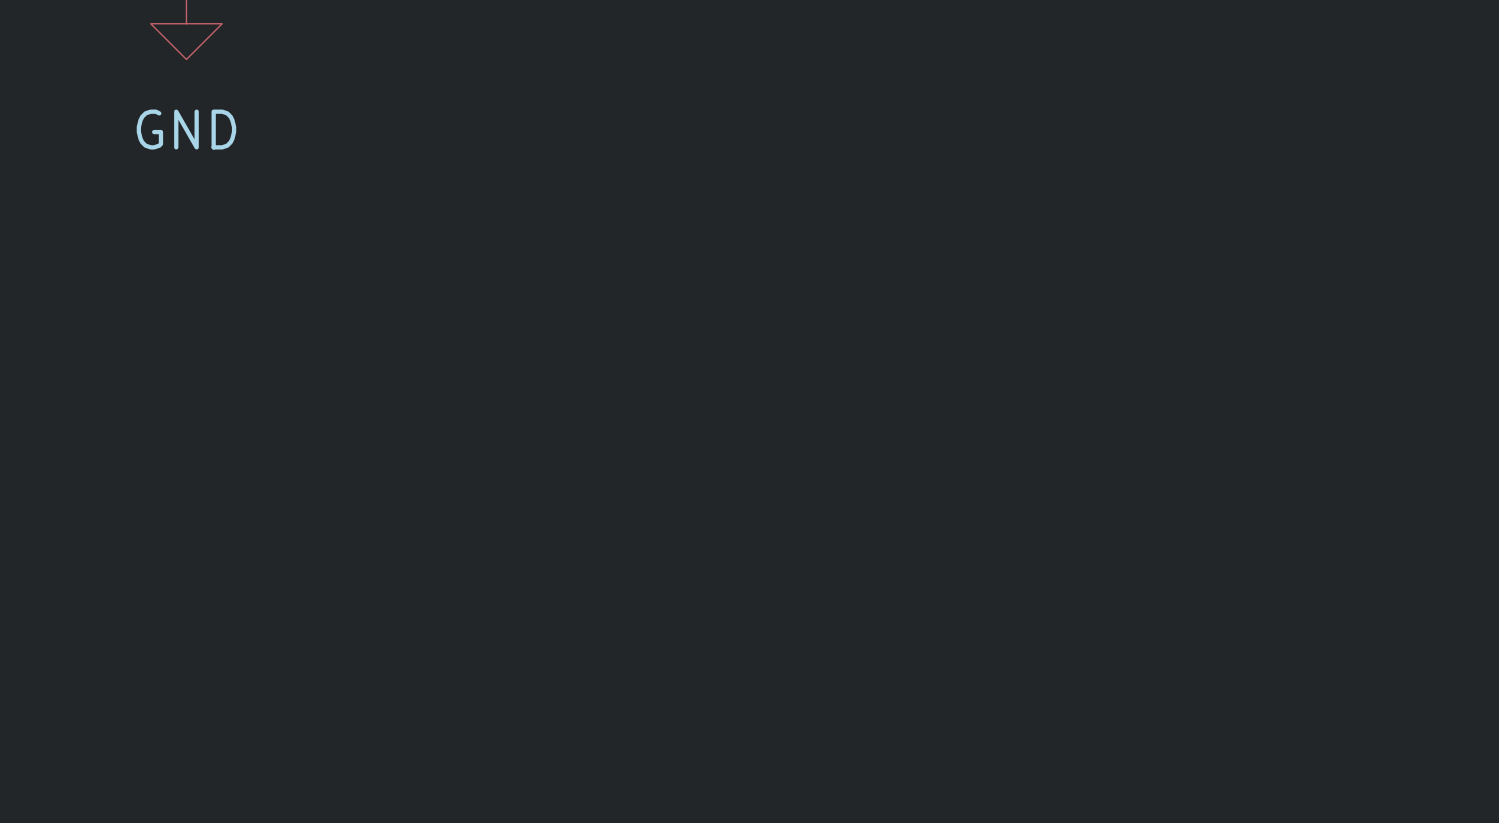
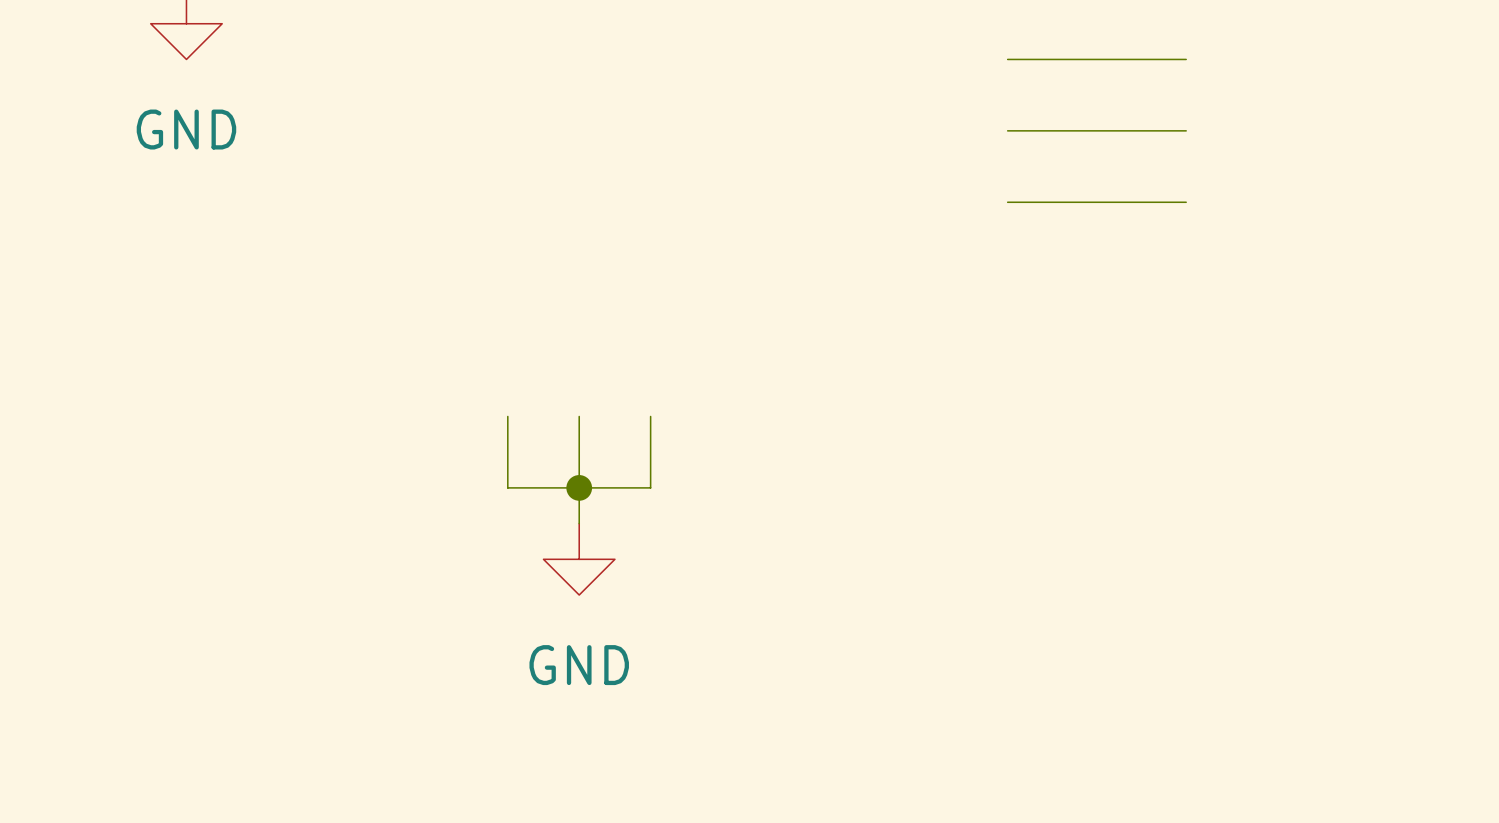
wire: none -> (1007, 59) (1186, 59)
wire: none -> (1007, 130) (1186, 130)
wire: none -> (1007, 202) (1186, 202)
wire: none -> (507, 416) (507, 487) (650, 487) (650, 416)
wire: none -> (579, 416) (579, 523)
junction: none -> (579, 487)
power symbol: none -> GND (579, 559)

